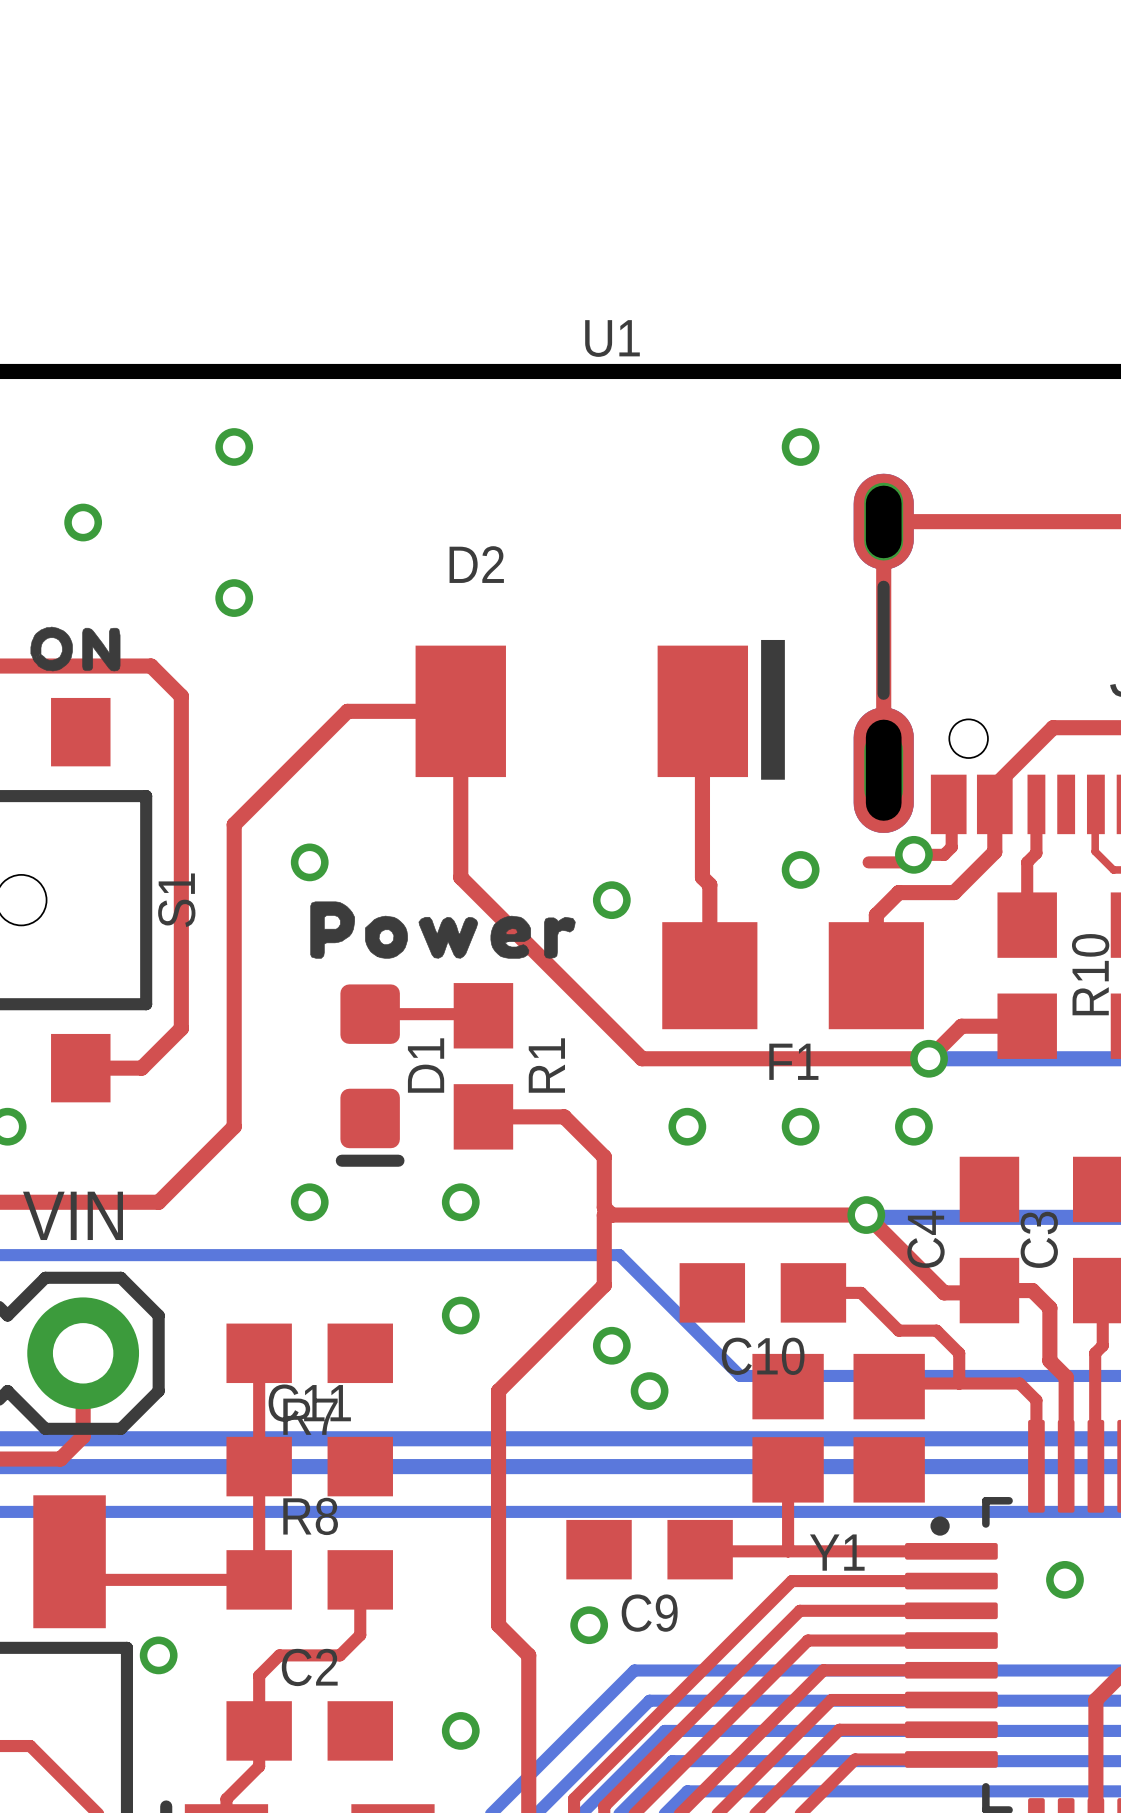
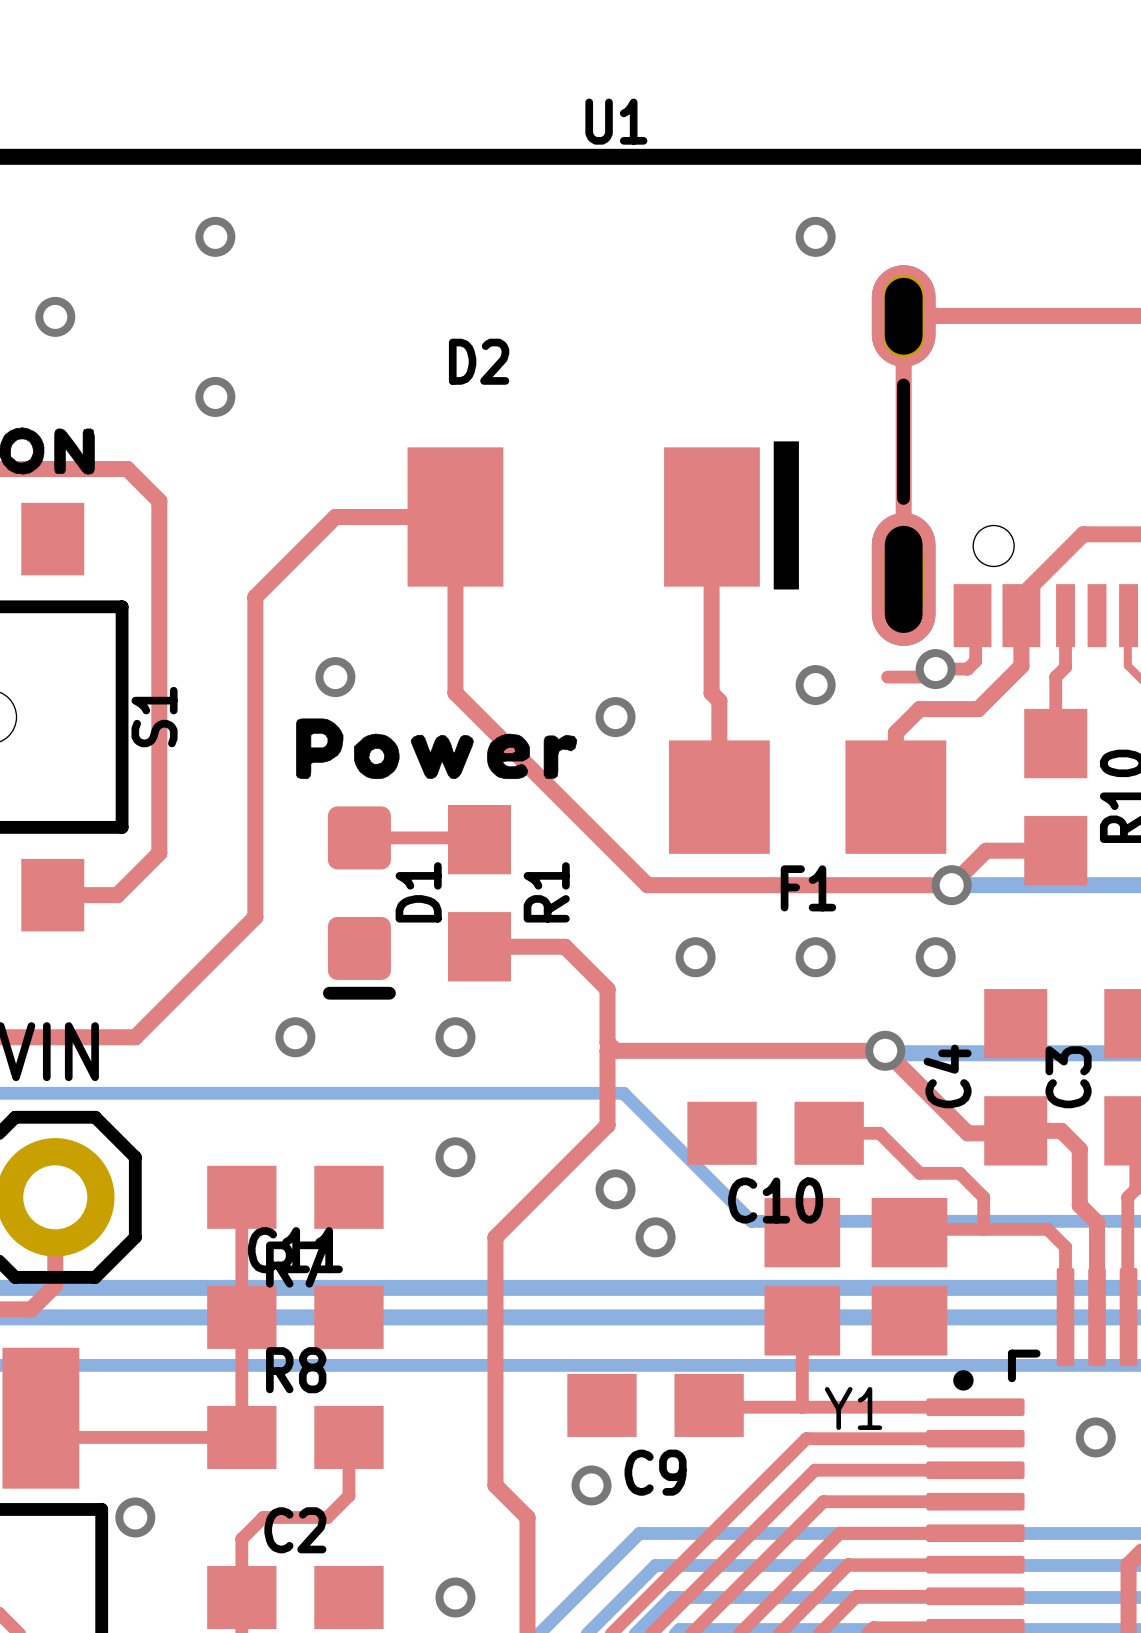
top track: (271, 786) (234, 824) (234, 1126) -> (255, 597) (255, 917) (215, 957)
via position: (309, 862) -> (335, 677)

